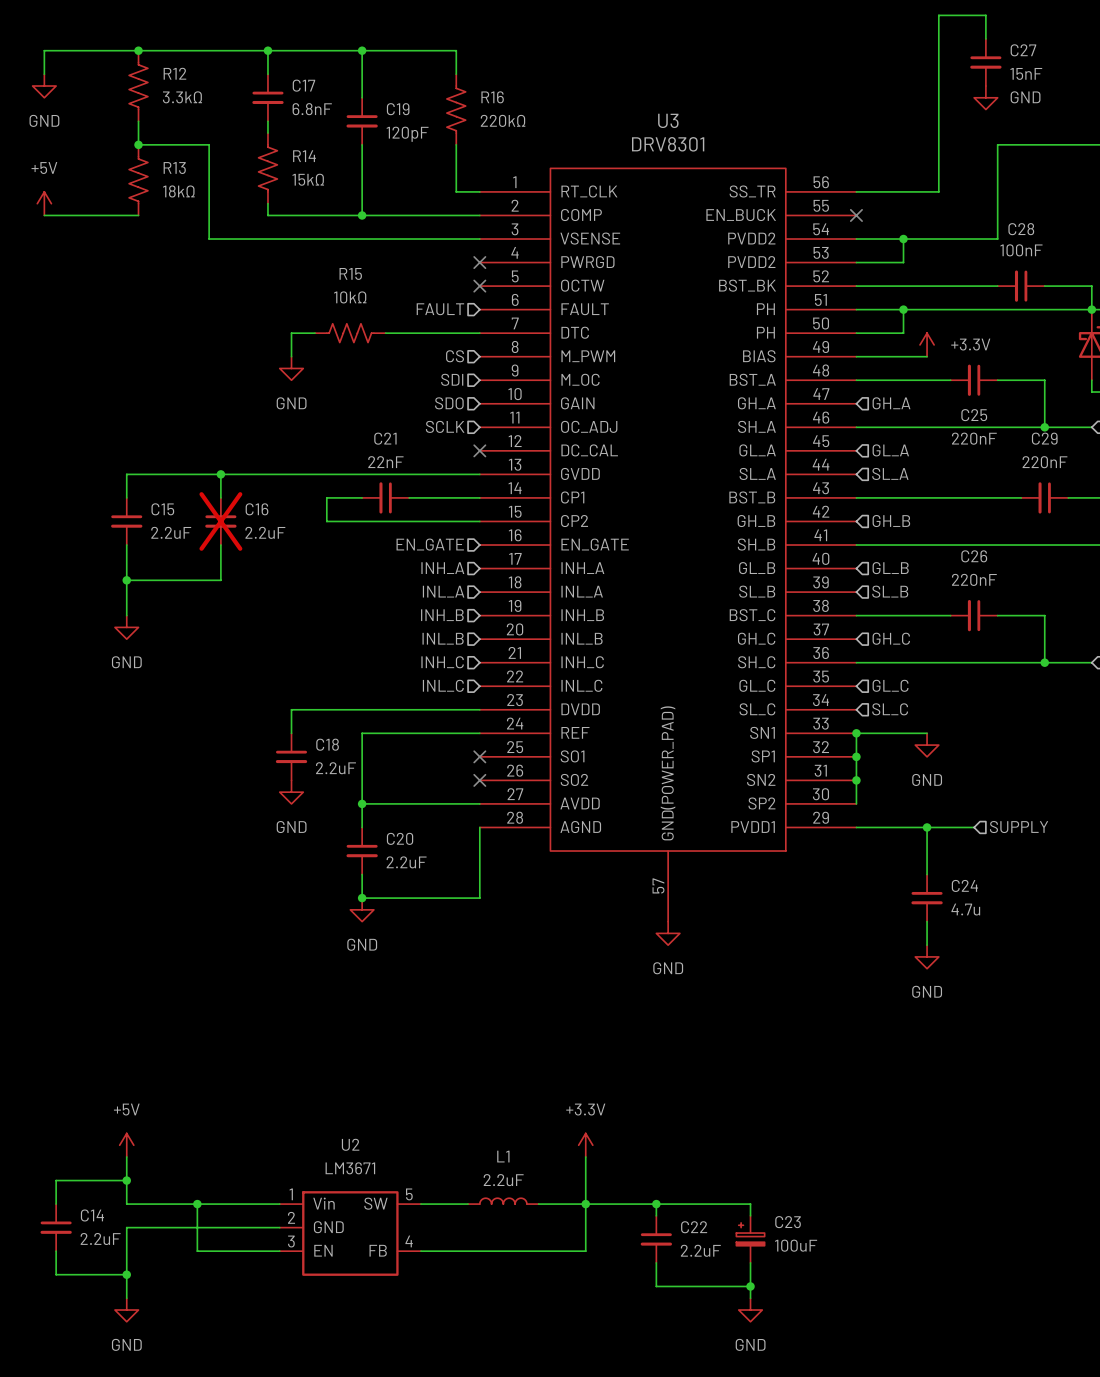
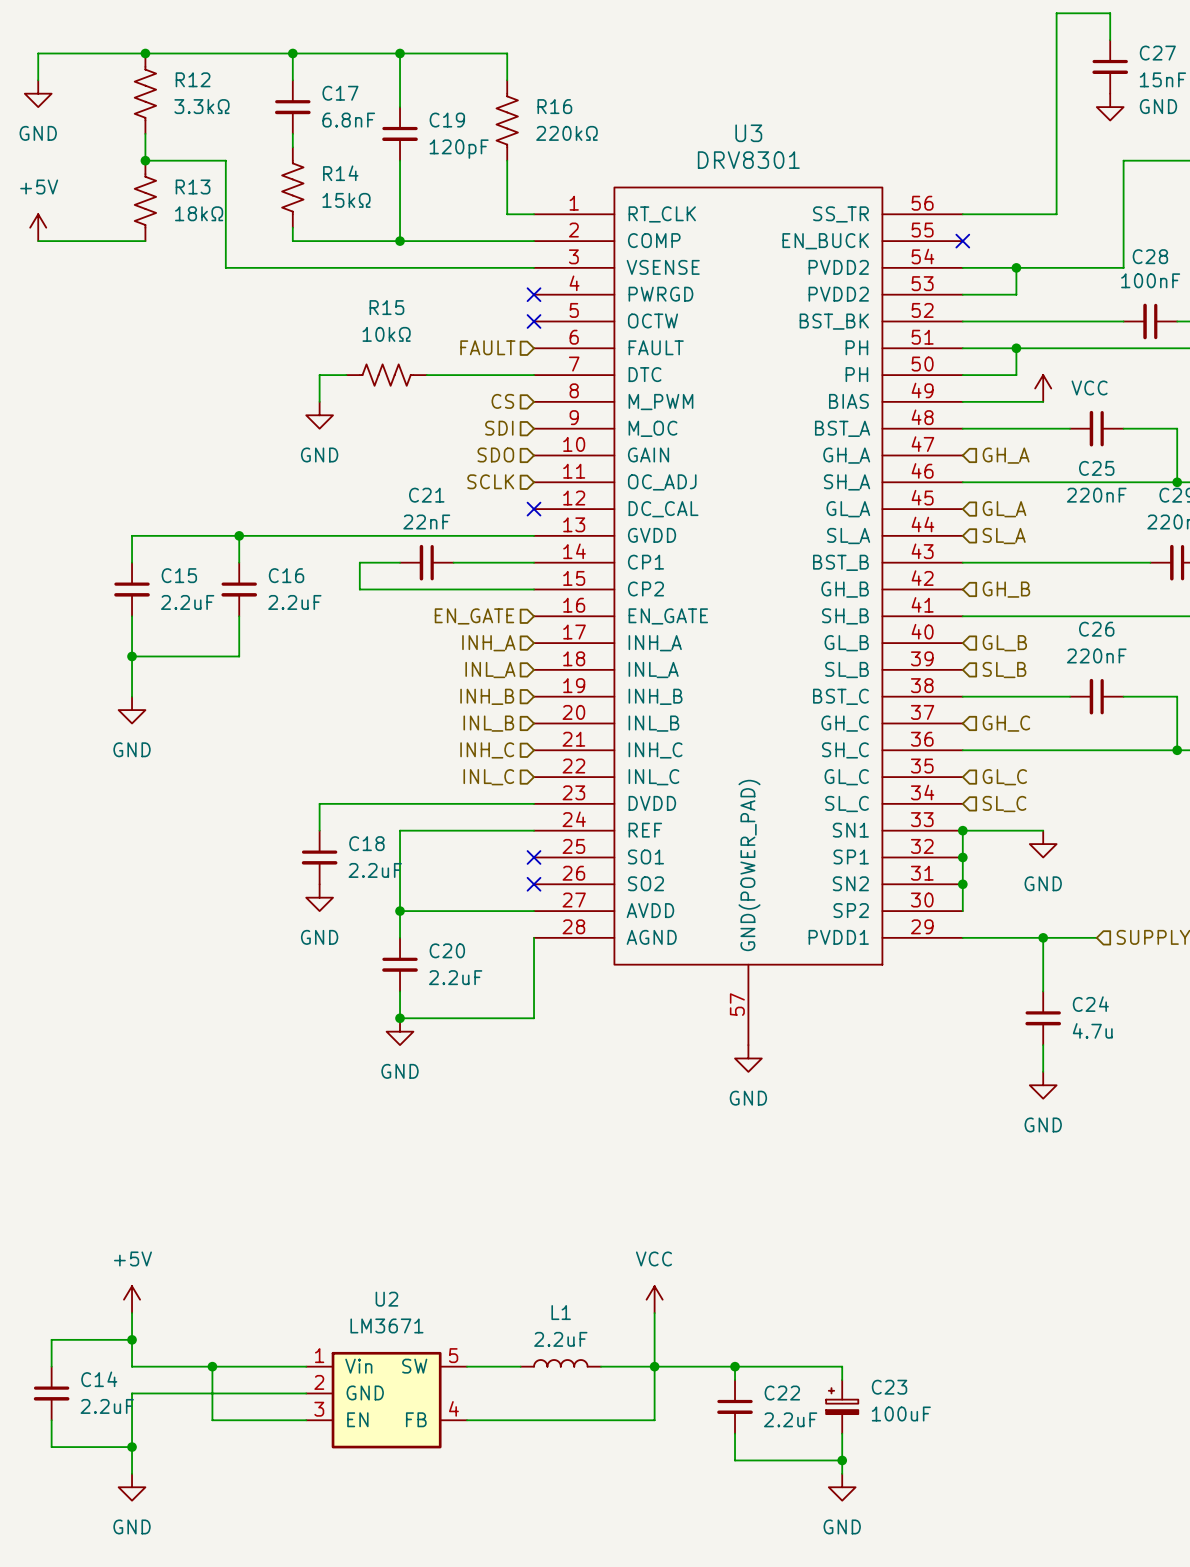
power symbol: +3.3V (927, 344) -> VCC (1043, 388)
C16 do-not-place cross: (220, 521) -> none
power symbol: +3.3V (585, 1145) -> VCC (654, 1299)

